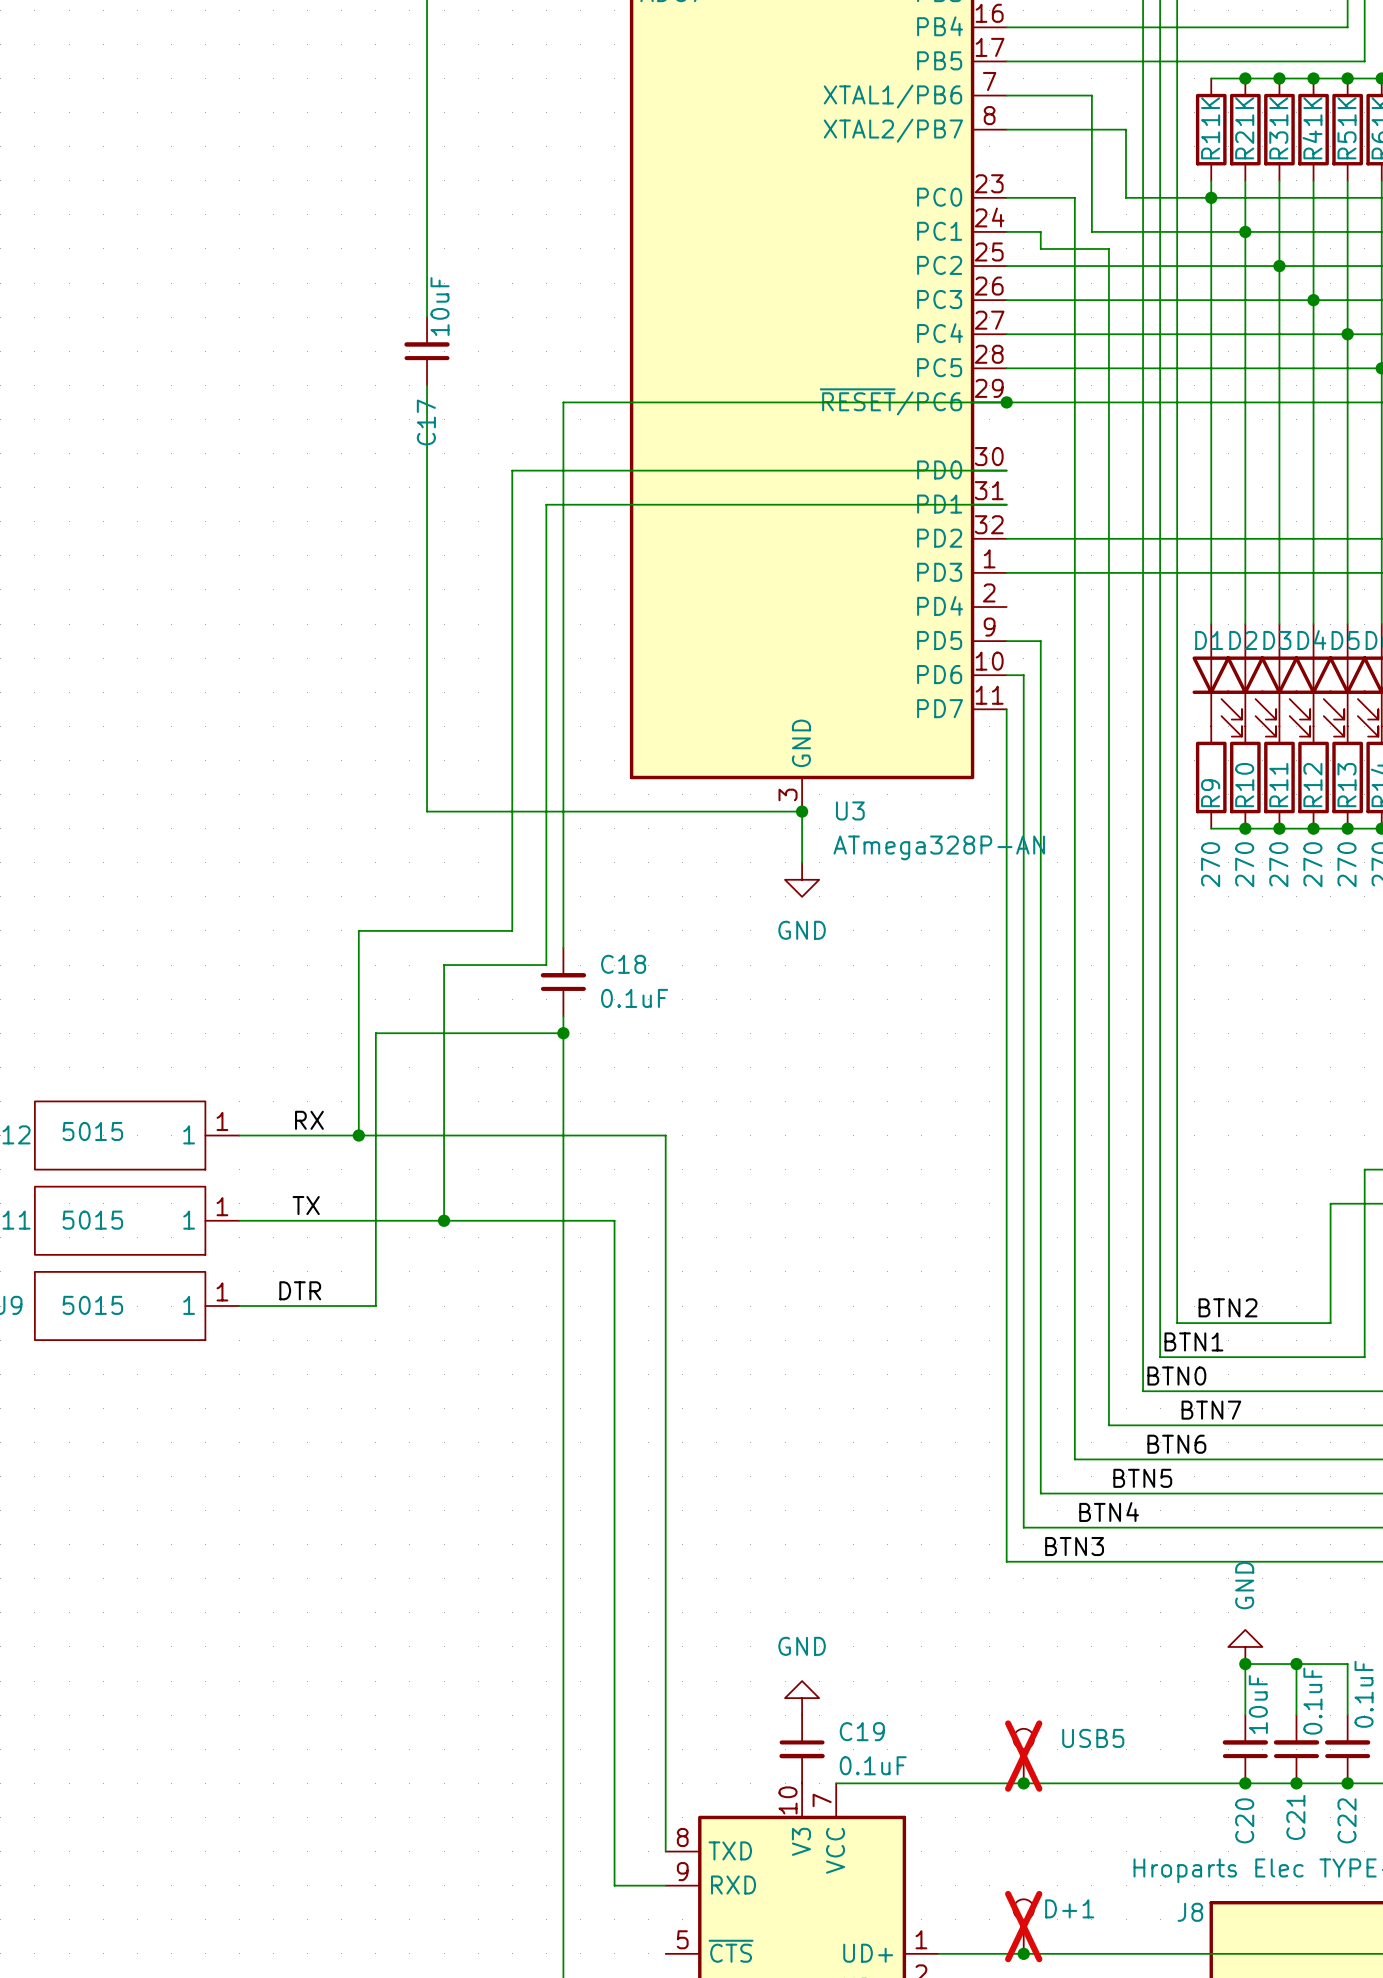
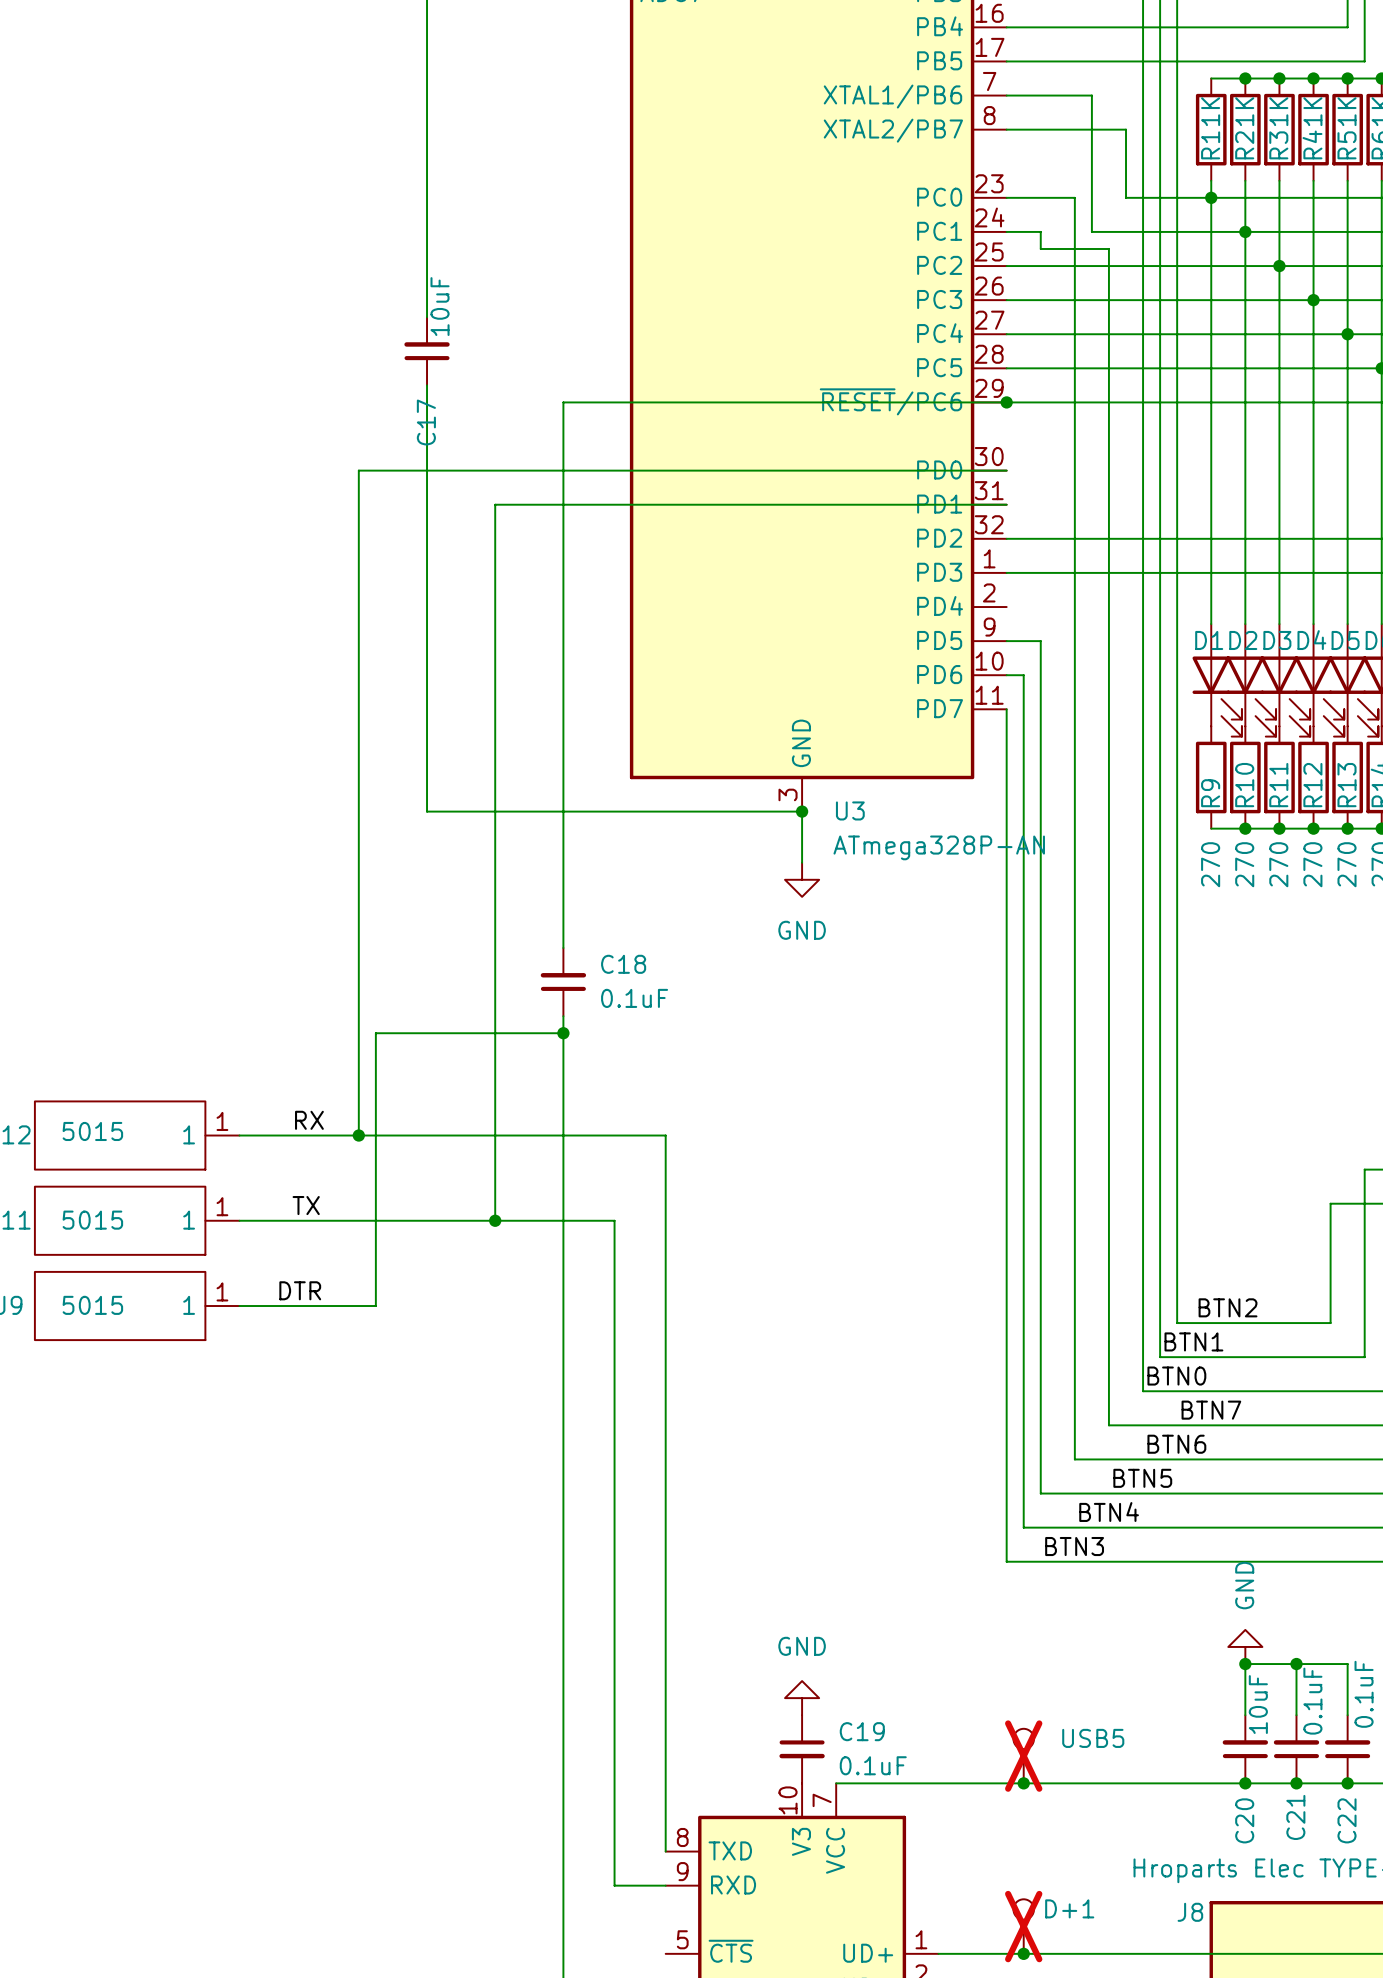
wire: (512, 470) (512, 930) (358, 930) -> (512, 470) (358, 470) (358, 930)
wire: (546, 504) (546, 965) (444, 965) (444, 1220) -> (546, 504) (495, 504) (495, 1220)
junction position: (444, 1220) -> (495, 1220)

